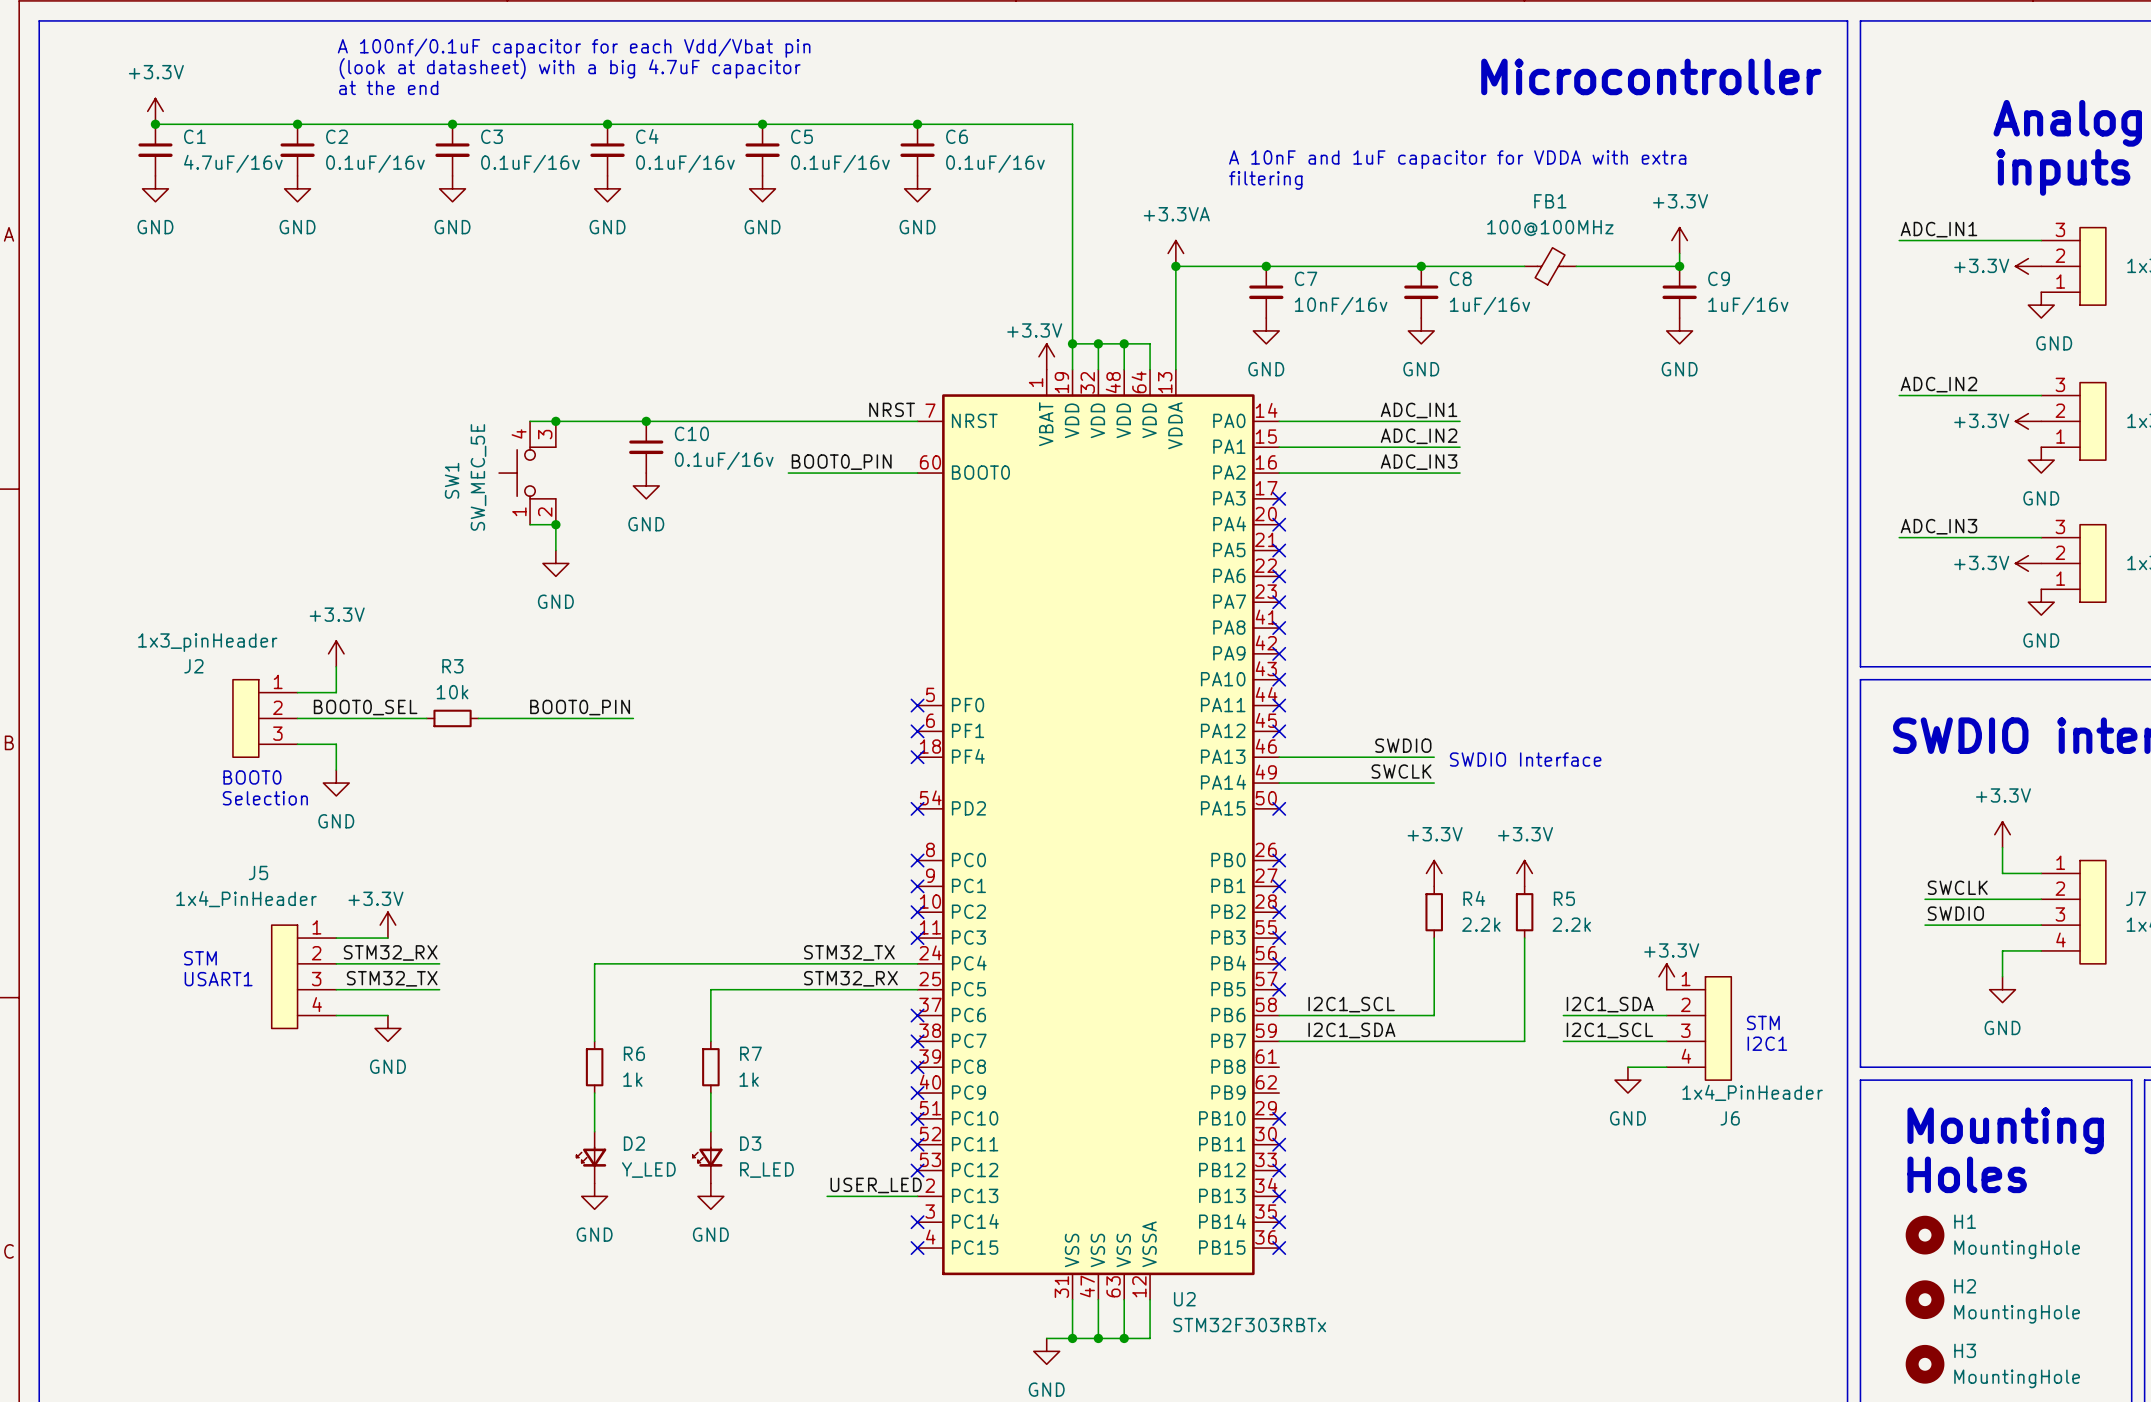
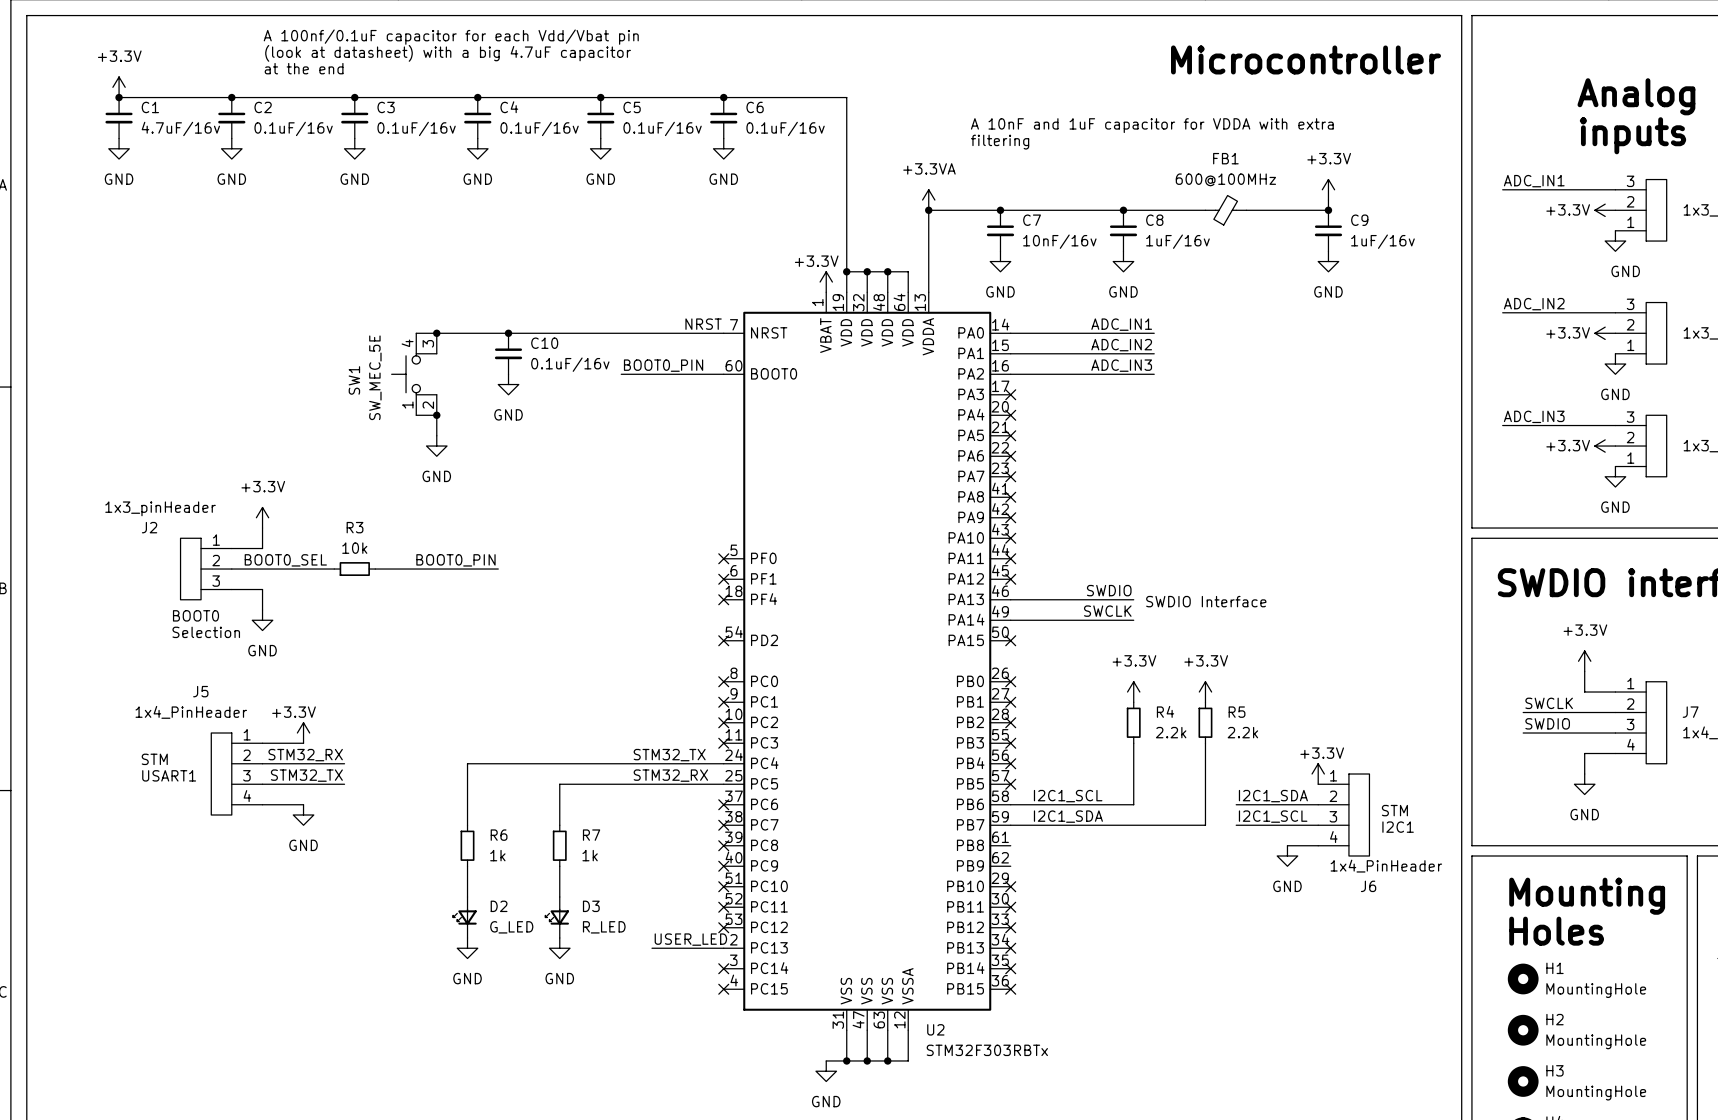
FB1 value: 100@100MHz (1550, 228) -> 600@100MHz (1225, 179)
D2 value: Y_LED (648, 1170) -> G_LED (511, 927)

